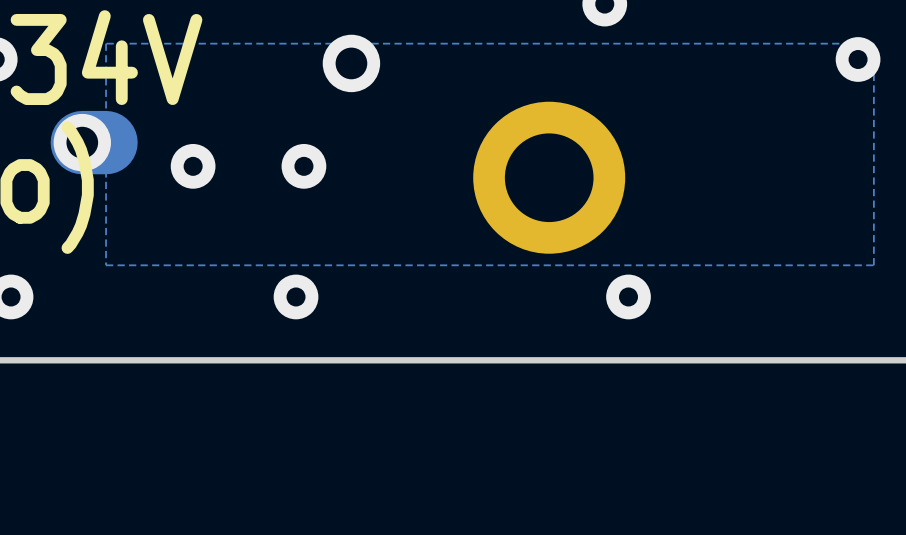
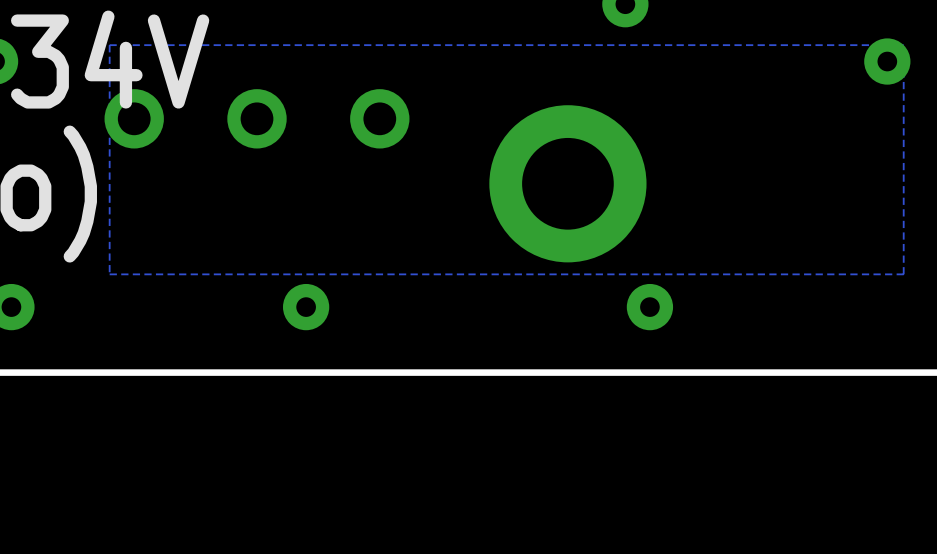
via position: (351, 63) -> (379, 118)
via: none -> (257, 118)
via position: (82, 142) -> (134, 118)
track: (106, 142) (82, 142) -> none
via: (193, 166) -> none
via: (303, 166) -> none

